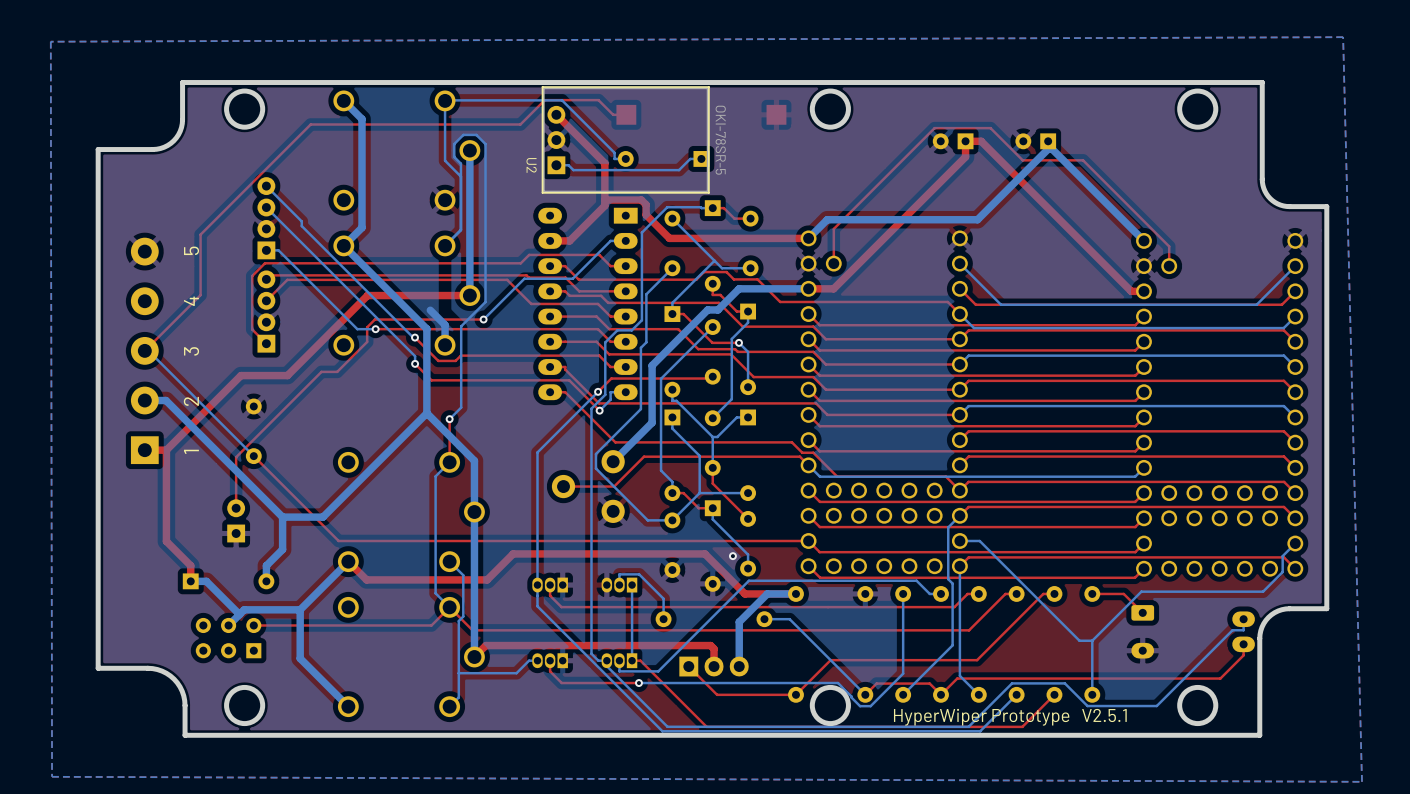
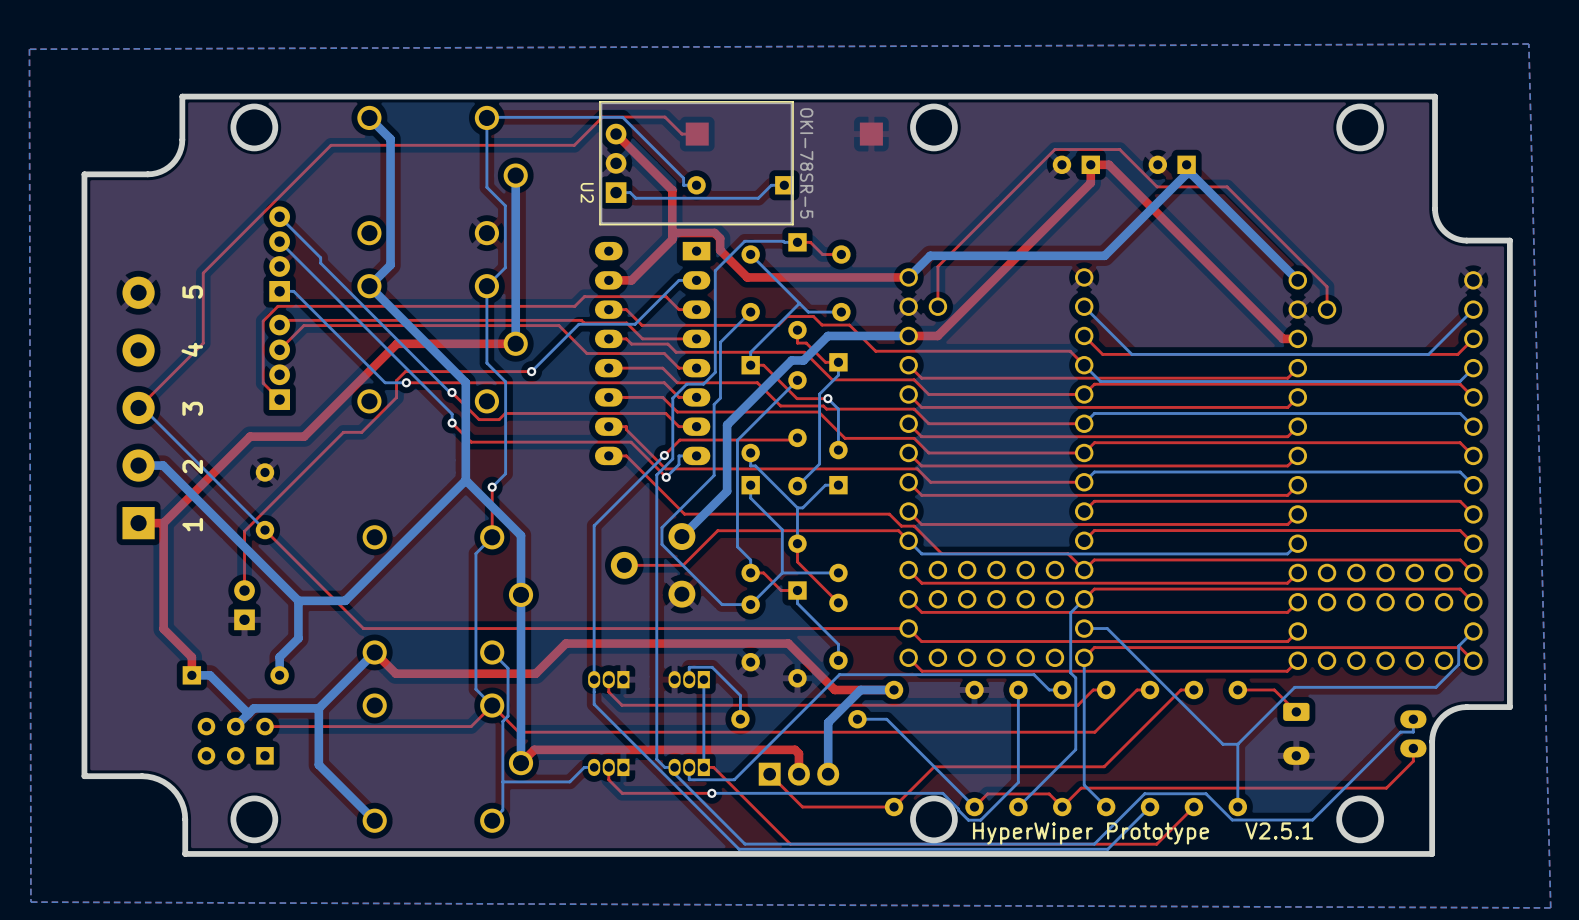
bottom track: (460, 230) (460, 163) (454, 157) (454, 144) (463, 134) (476, 134) (485, 144) (485, 302) (461, 328) -> (486, 286) (486, 363) (505, 381)
bottom track: (430, 310) (445, 325) (445, 345) -> none
via: (732, 556) -> none

